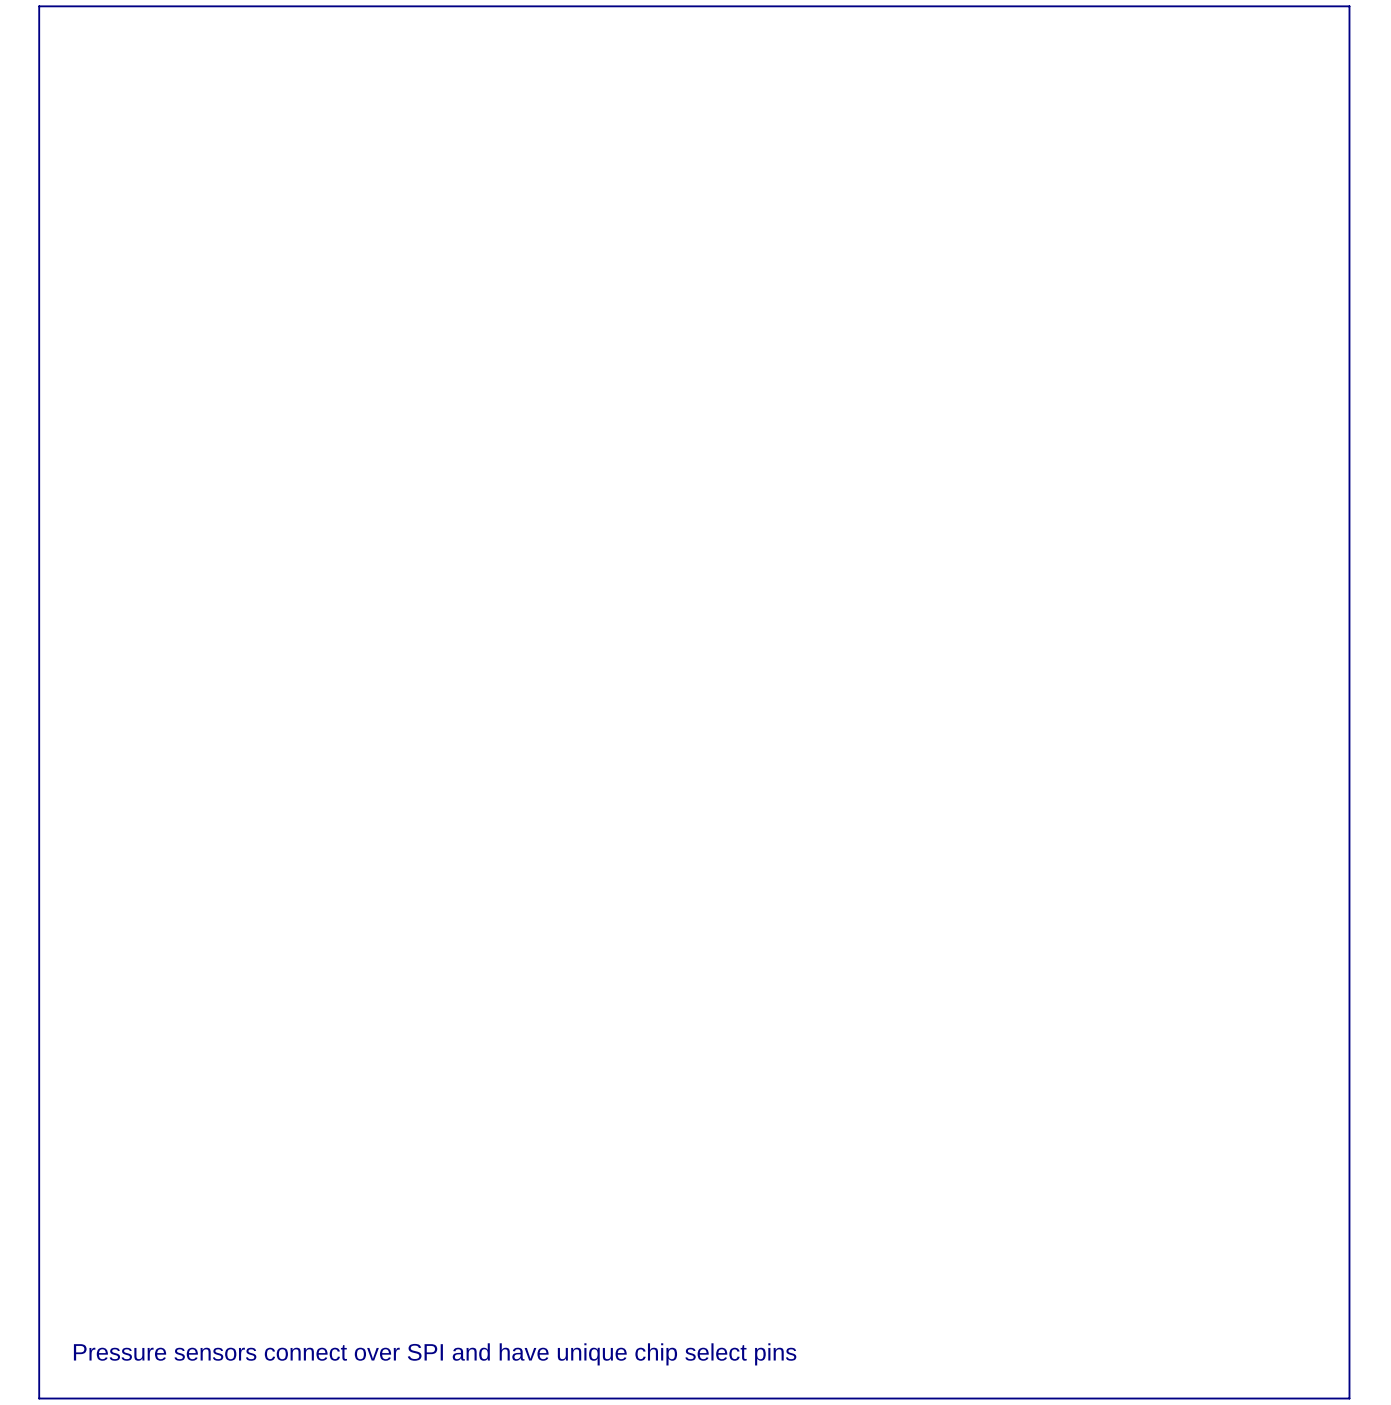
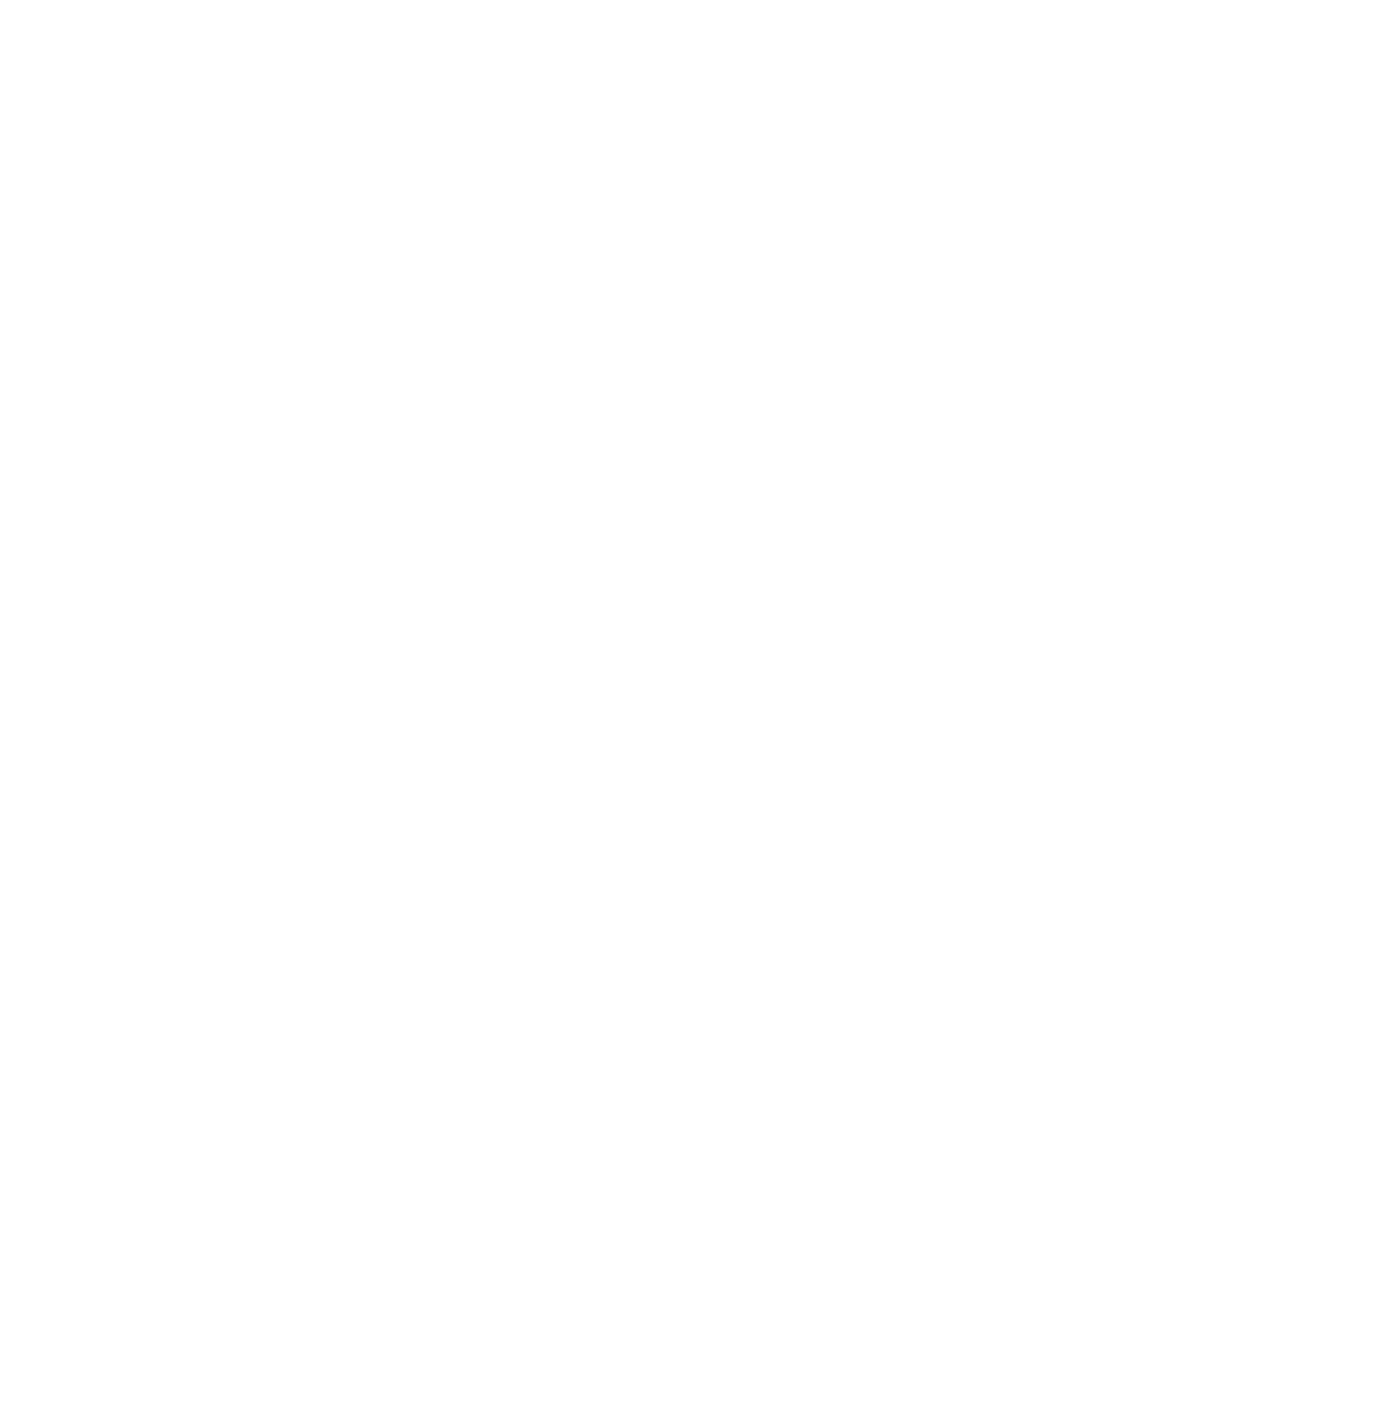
line: (39, 6) (39, 1398) (1349, 1398) (1349, 6) (39, 6) -> none
text: Pressure sensors connect over SPI and have unique chip select pins (435, 1354) -> none

